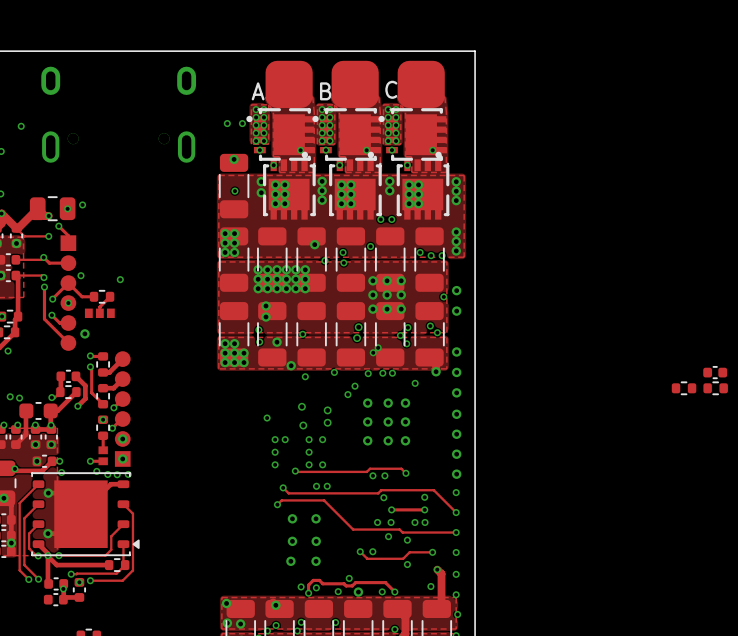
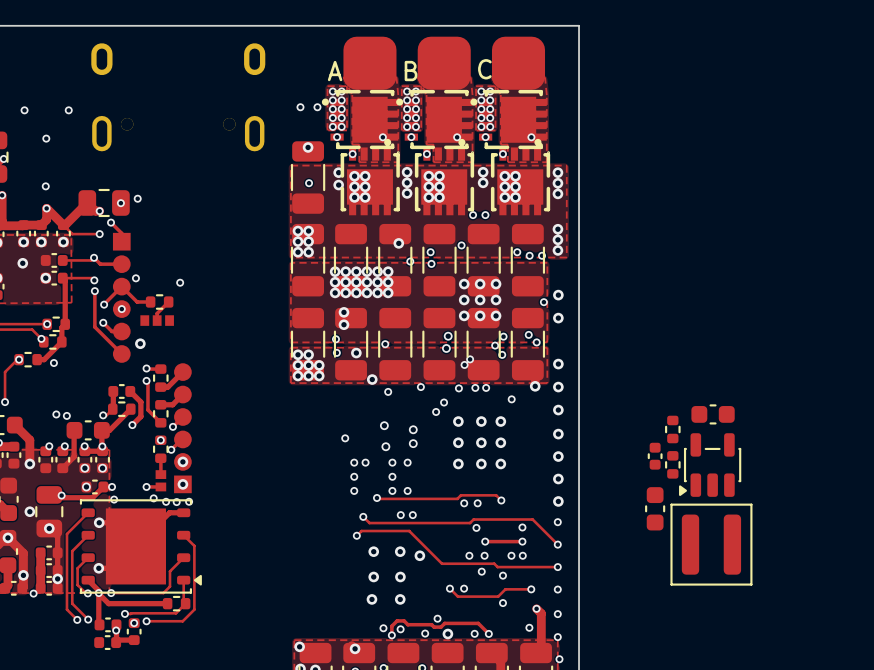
part rotation: 0° (715, 372) -> 90° clockwise (655, 456)
part position: (715, 372) -> (655, 456)
part: (684, 388) -> none
part: (715, 388) -> none
part: none -> (713, 414)
part: none -> (672, 429)
part: none -> (672, 464)
part: none -> (710, 465)
part: none -> (655, 508)
part: none -> (711, 544)
via: none -> (419, 555)

